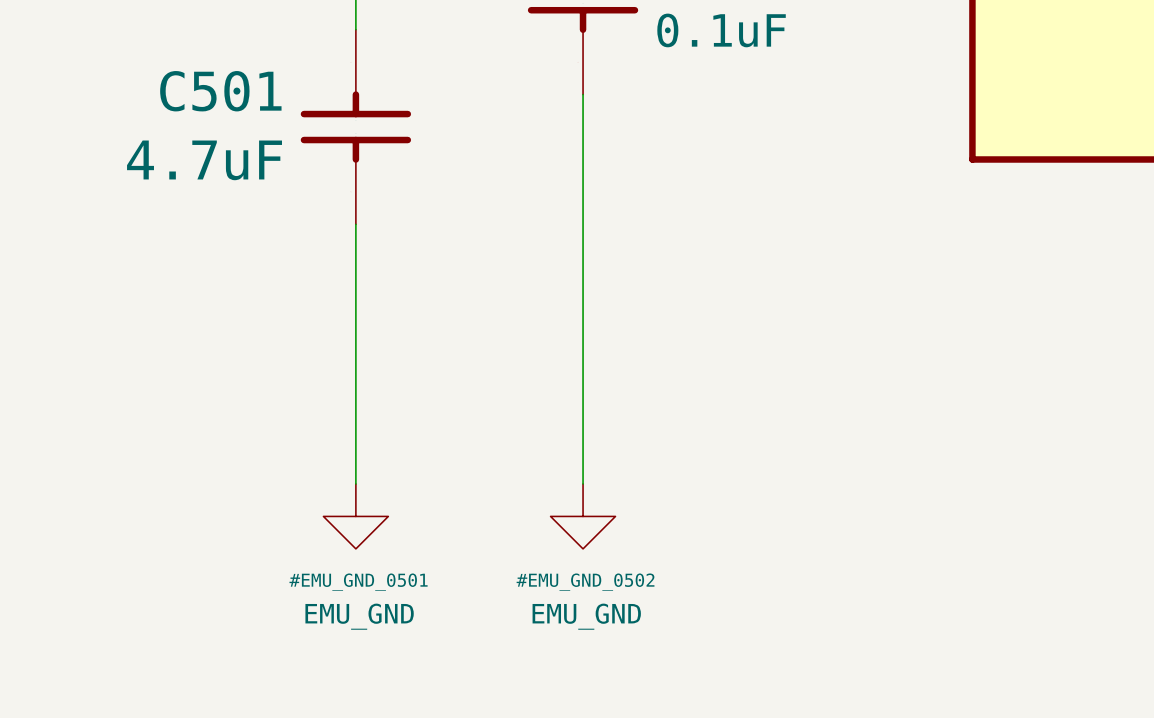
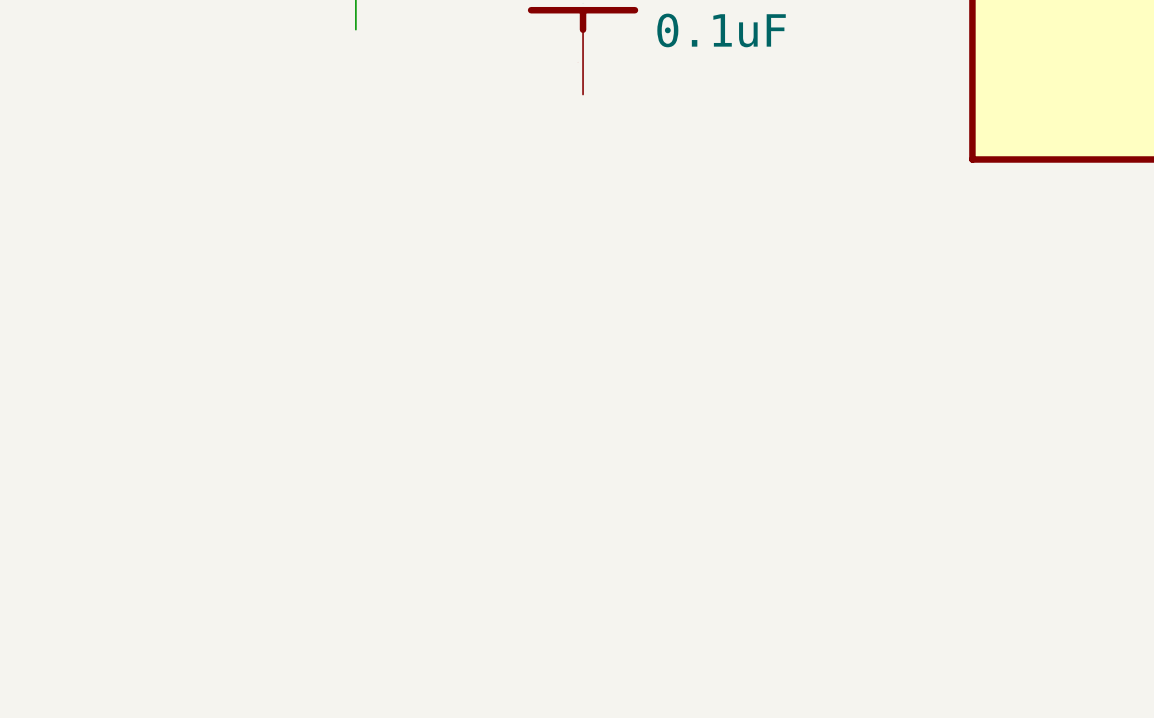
wire: (583, 94) (583, 483) -> none
C501: (355, 127) -> none
wire: (355, 224) (355, 483) -> none
#EMU_GND_0501: EMU_GND (355, 516) -> none
#EMU_GND_0502: EMU_GND (583, 516) -> none

